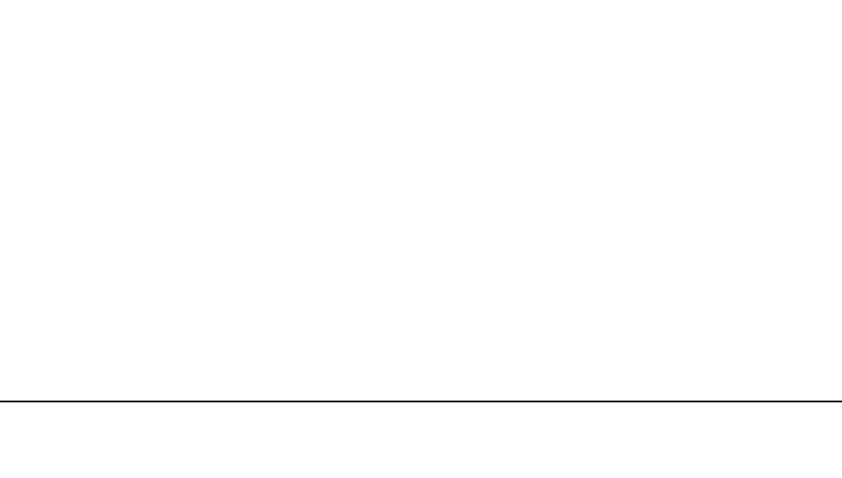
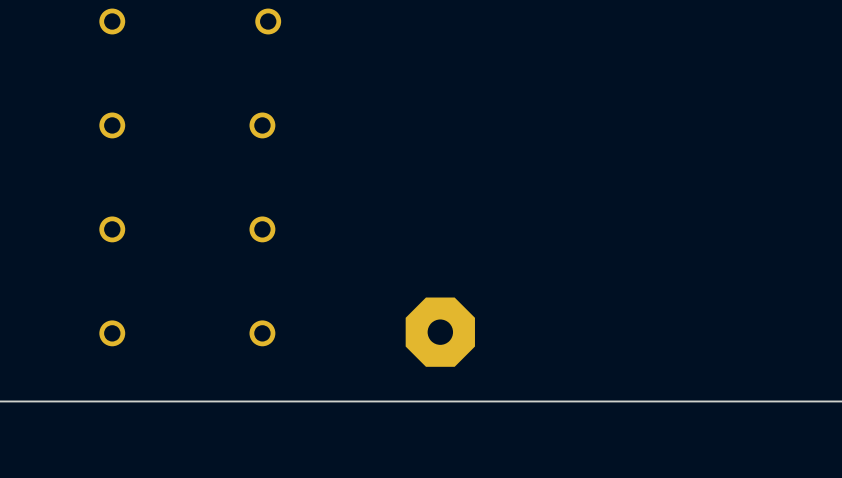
part: none -> (112, 21)
part: none -> (268, 21)
part: none -> (112, 125)
part: none -> (262, 125)
part: none -> (112, 229)
part: none -> (262, 229)
part: none -> (440, 332)
part: none -> (112, 333)
part: none -> (262, 333)

